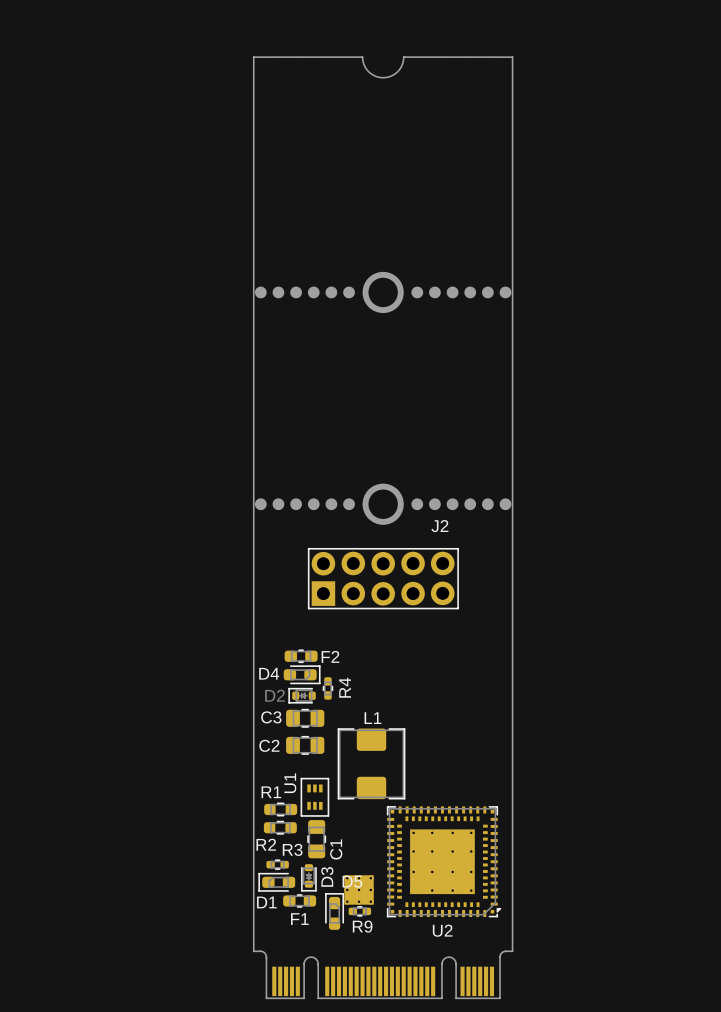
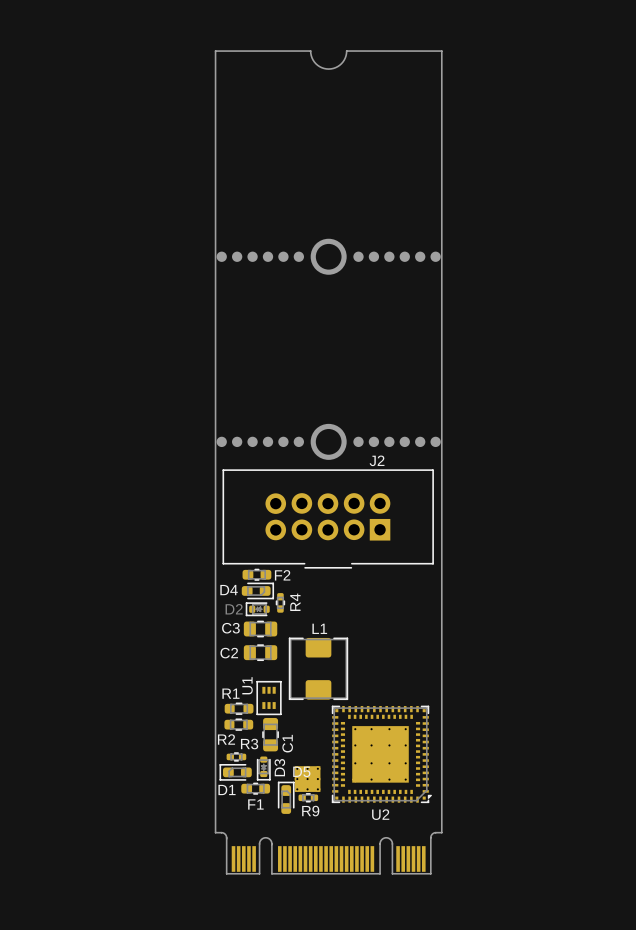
J2 footprint: [308, 548, 459, 610] -> [222, 469, 434, 569]

